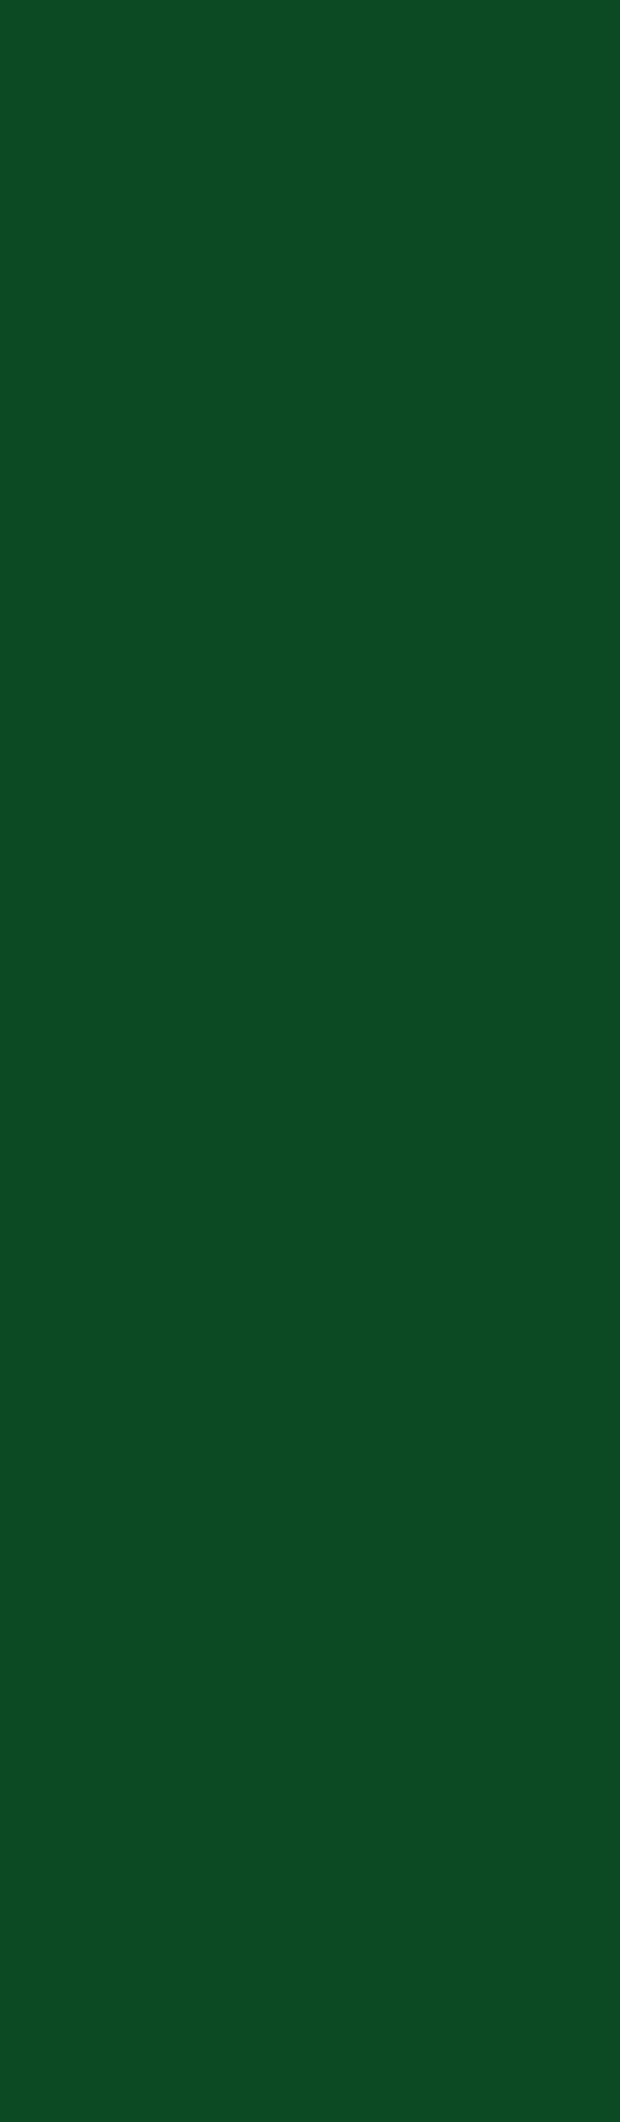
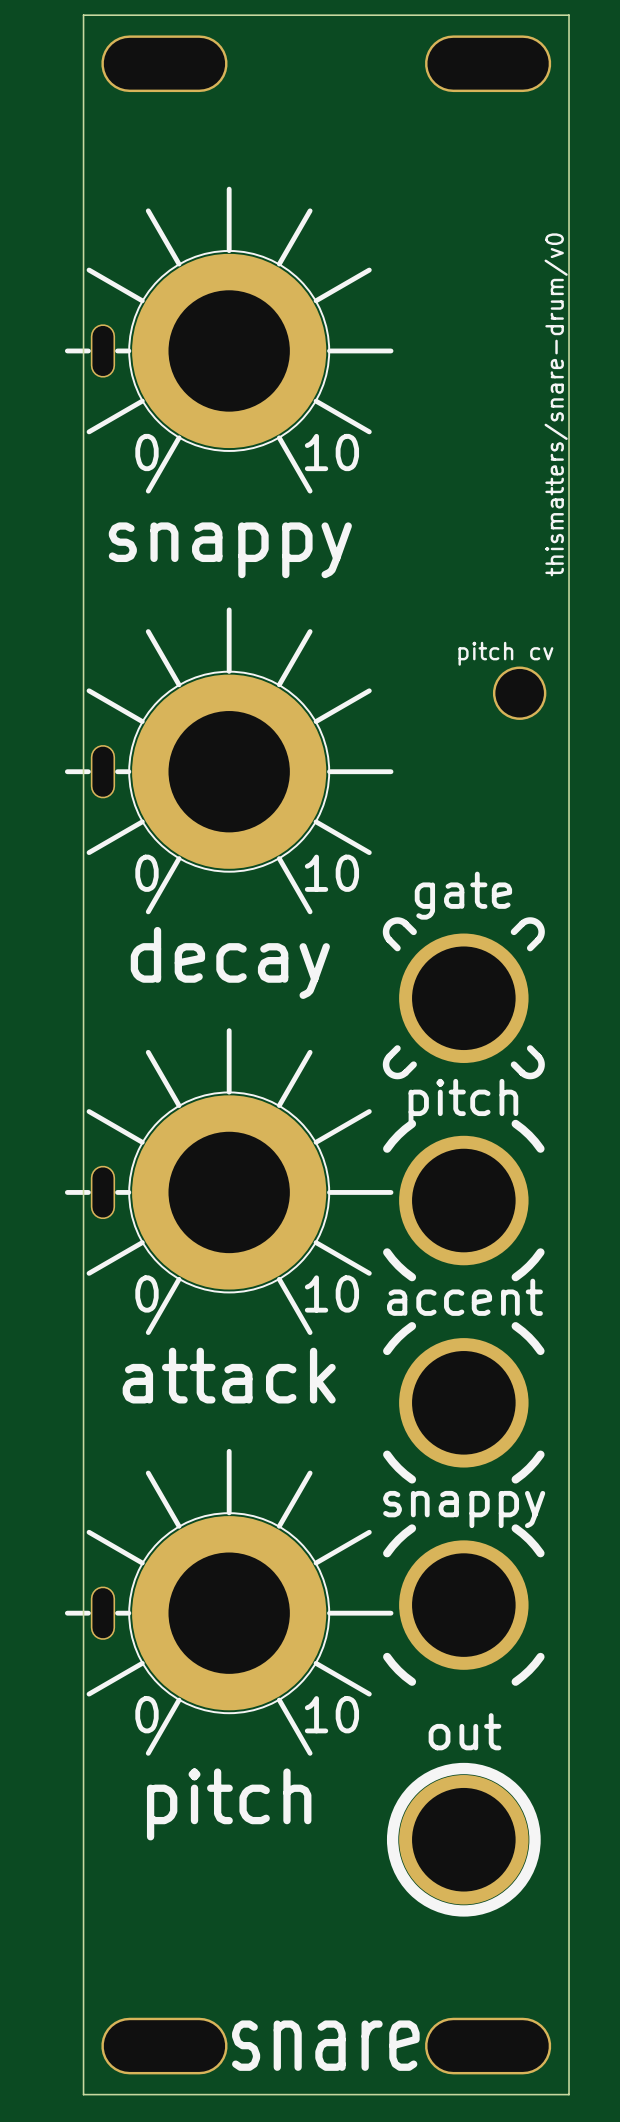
board edge: none -> (83, 15) (569, 15) (569, 2094) (83, 2094) (83, 15)
part: none -> (164, 63)
part: none -> (488, 63)
part: none -> snappy (229, 340)
text: none -> thismatters/snare-drum/v0 (556, 404)
part: none -> pitch cv (519, 693)
part: none -> decay (229, 760)
part: none -> gate (463, 998)
part: none -> attack (229, 1181)
part: none -> pitch (463, 1200)
part: none -> accent (463, 1402)
part: none -> pitch (229, 1602)
part: none -> snappy (463, 1605)
part: none -> out (463, 1839)
text: none -> snare (325, 2045)
part: none -> (164, 2046)
part: none -> (488, 2046)

